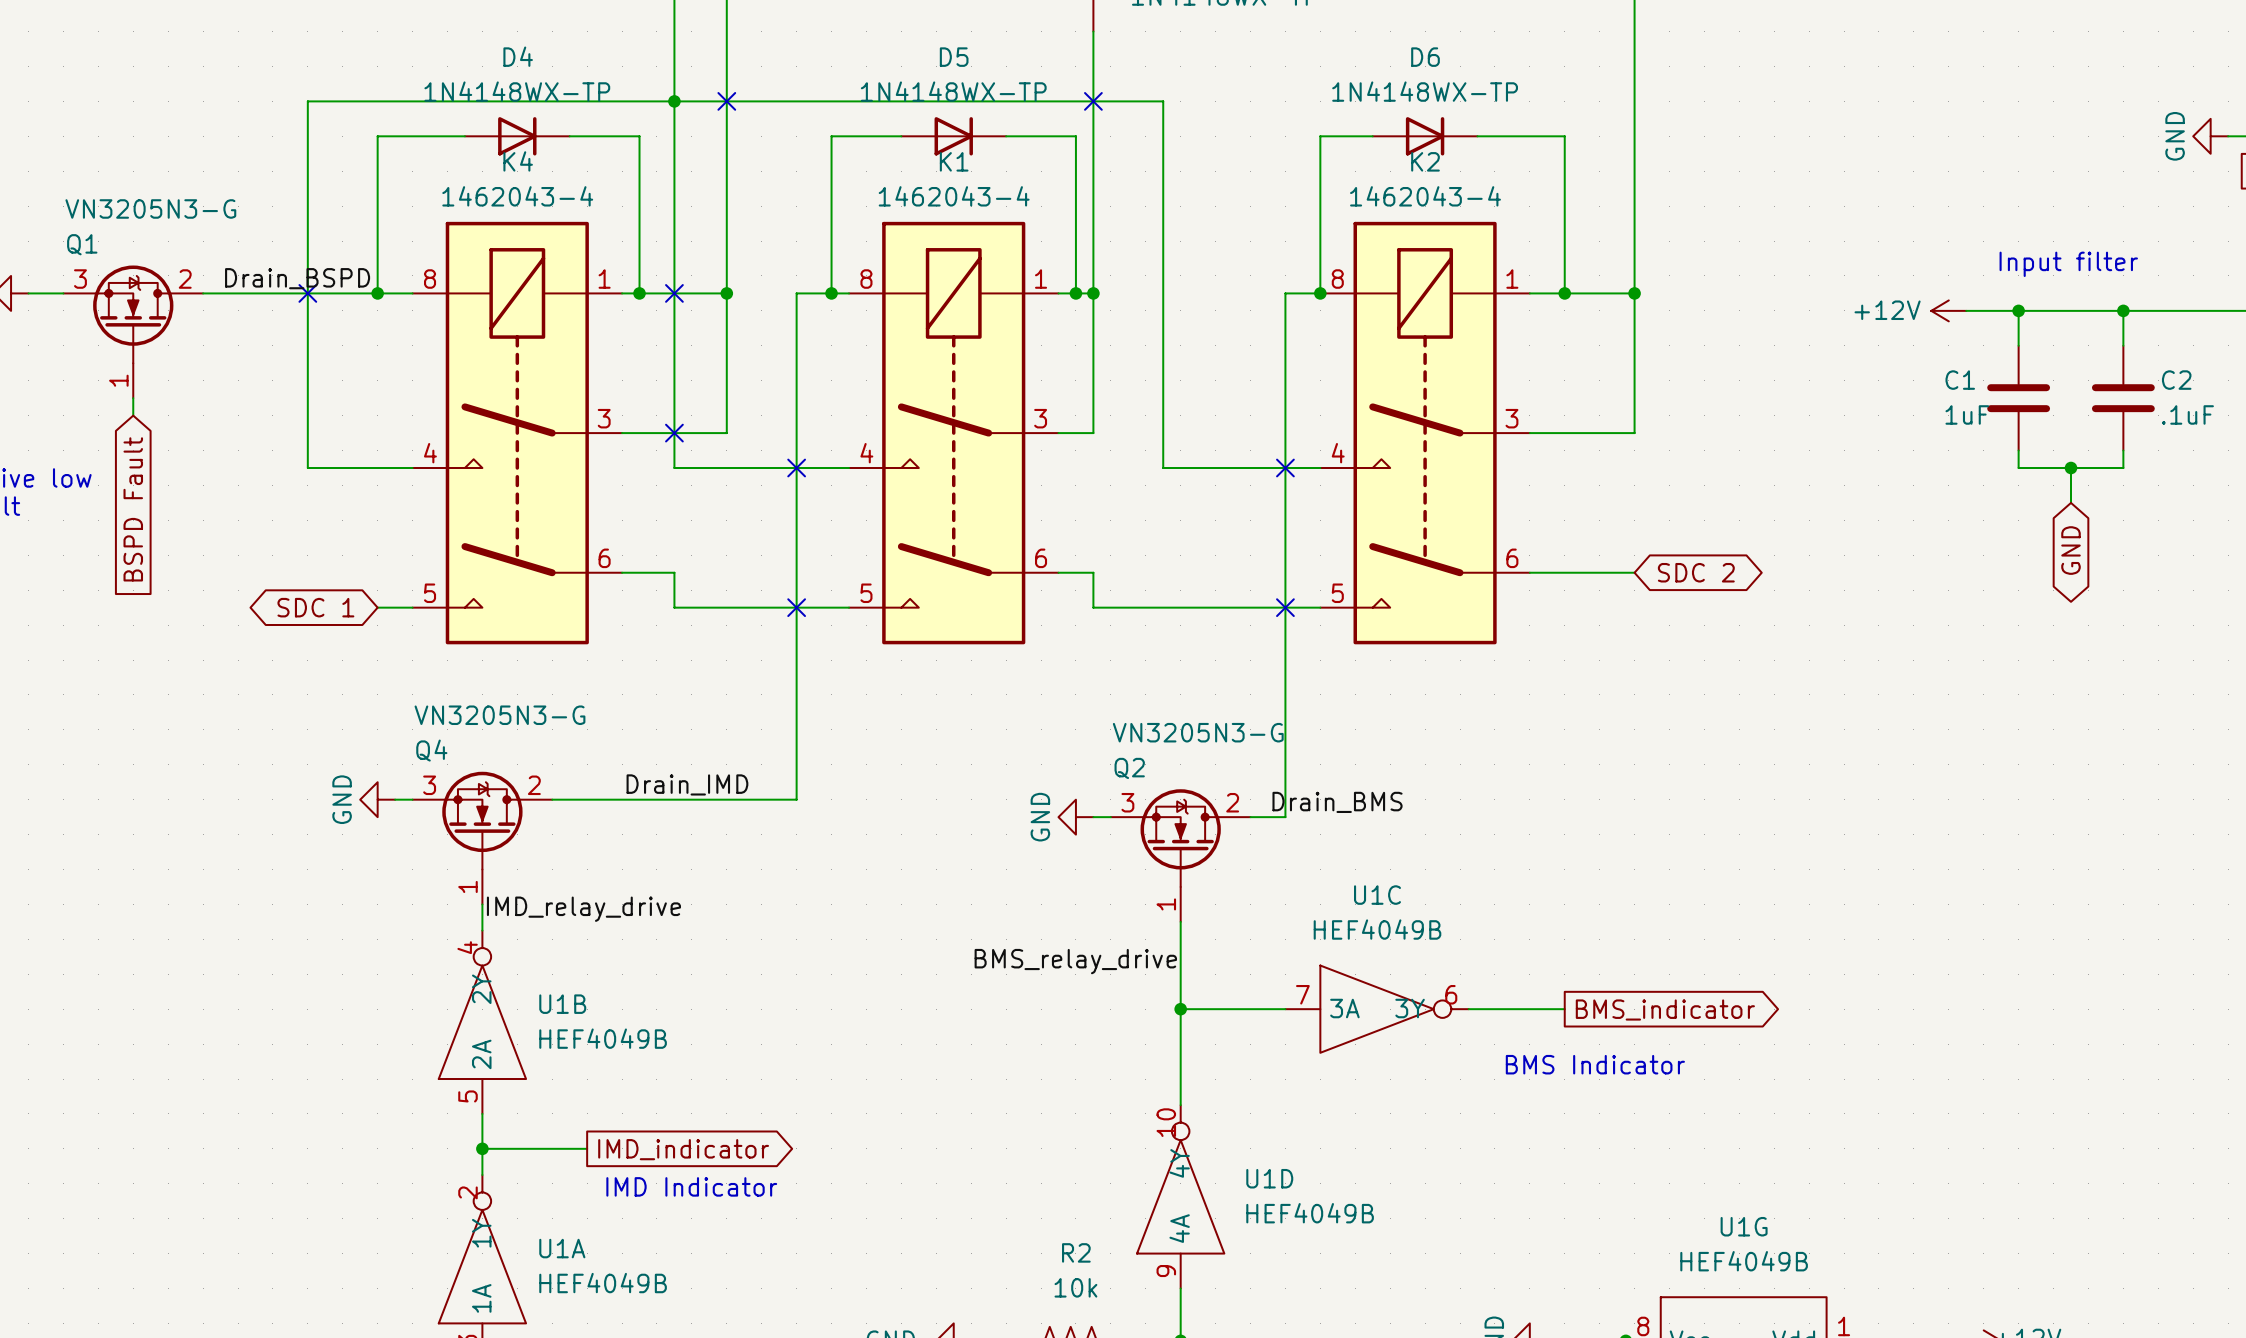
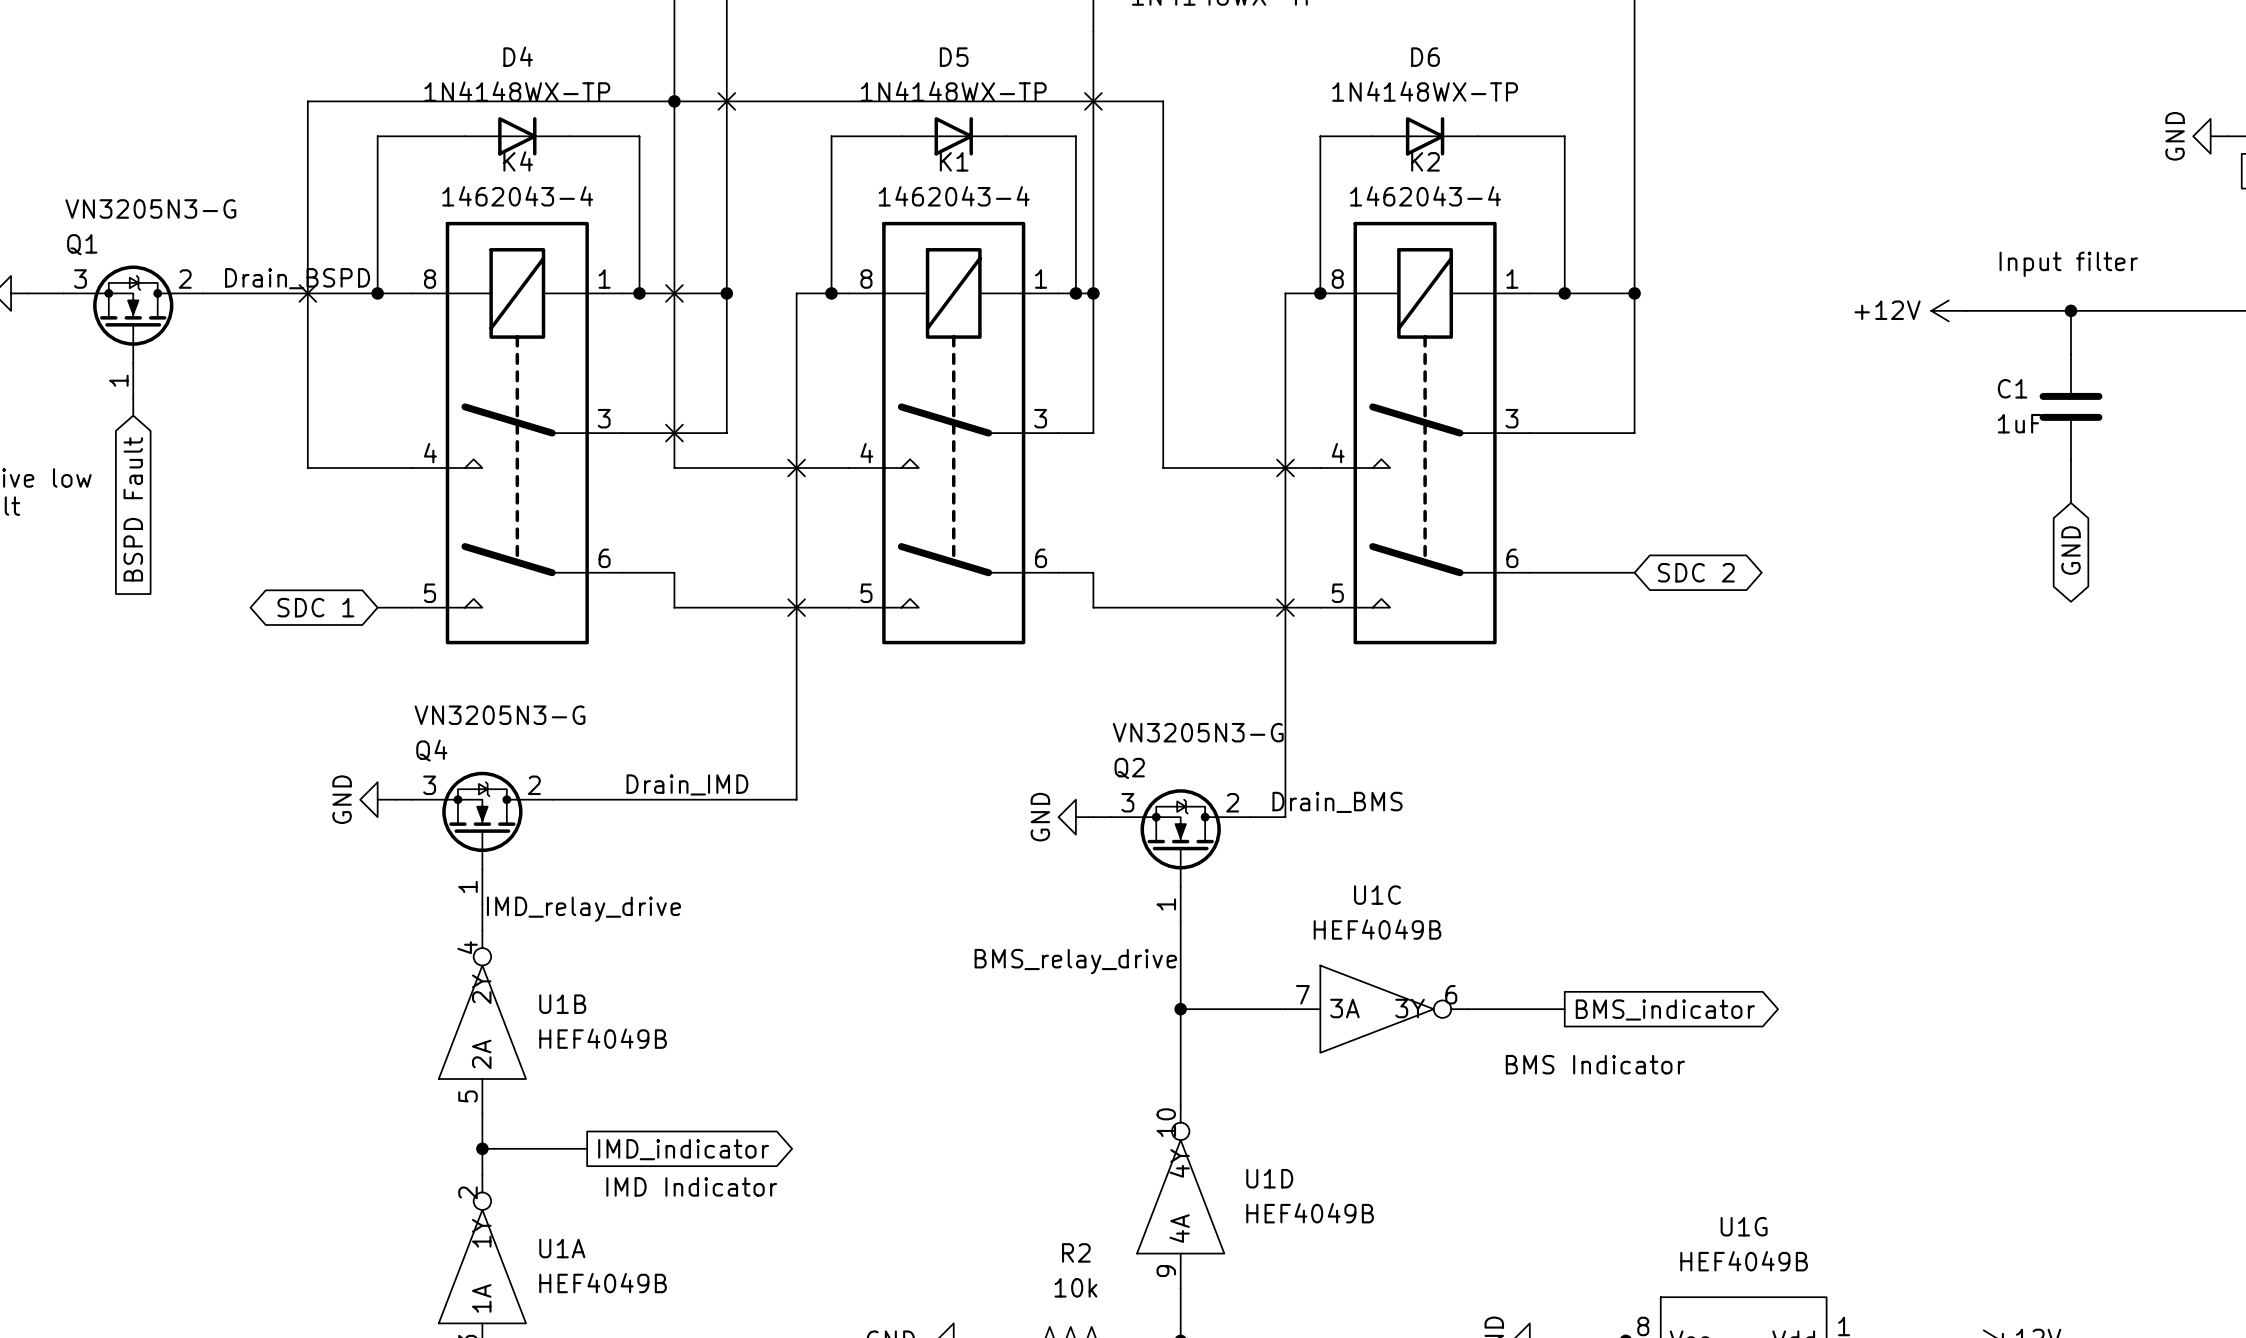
wire: (2018, 310) (2018, 345) -> none
junction: (2018, 310) -> none
wire: none -> (2071, 310) (2071, 354)
junction: none -> (2071, 310)
wire: (2123, 310) (2123, 345) -> none
junction: (2123, 310) -> none
C1 position: (2018, 398) -> (2071, 406)
C2: .1uF (2123, 398) -> none
wire: (2018, 450) (2018, 468) (2123, 468) (2123, 450) -> none
junction: (2071, 468) -> none

